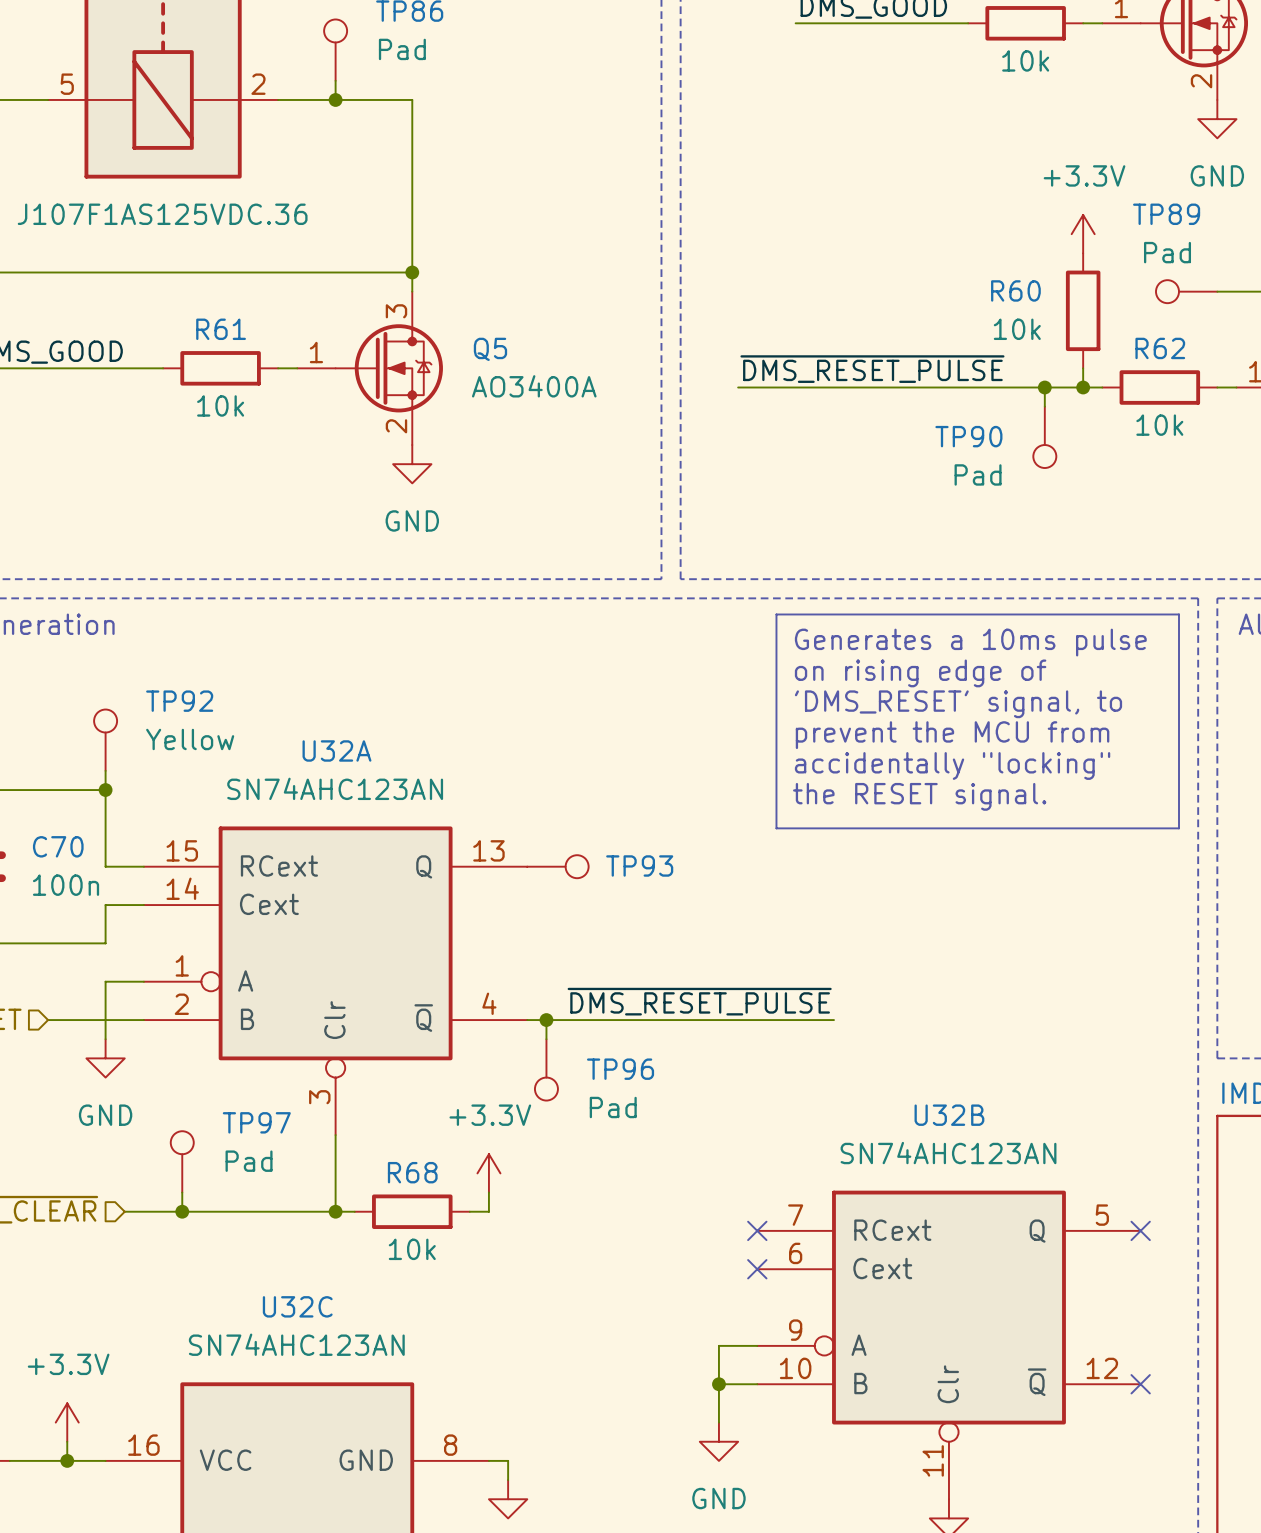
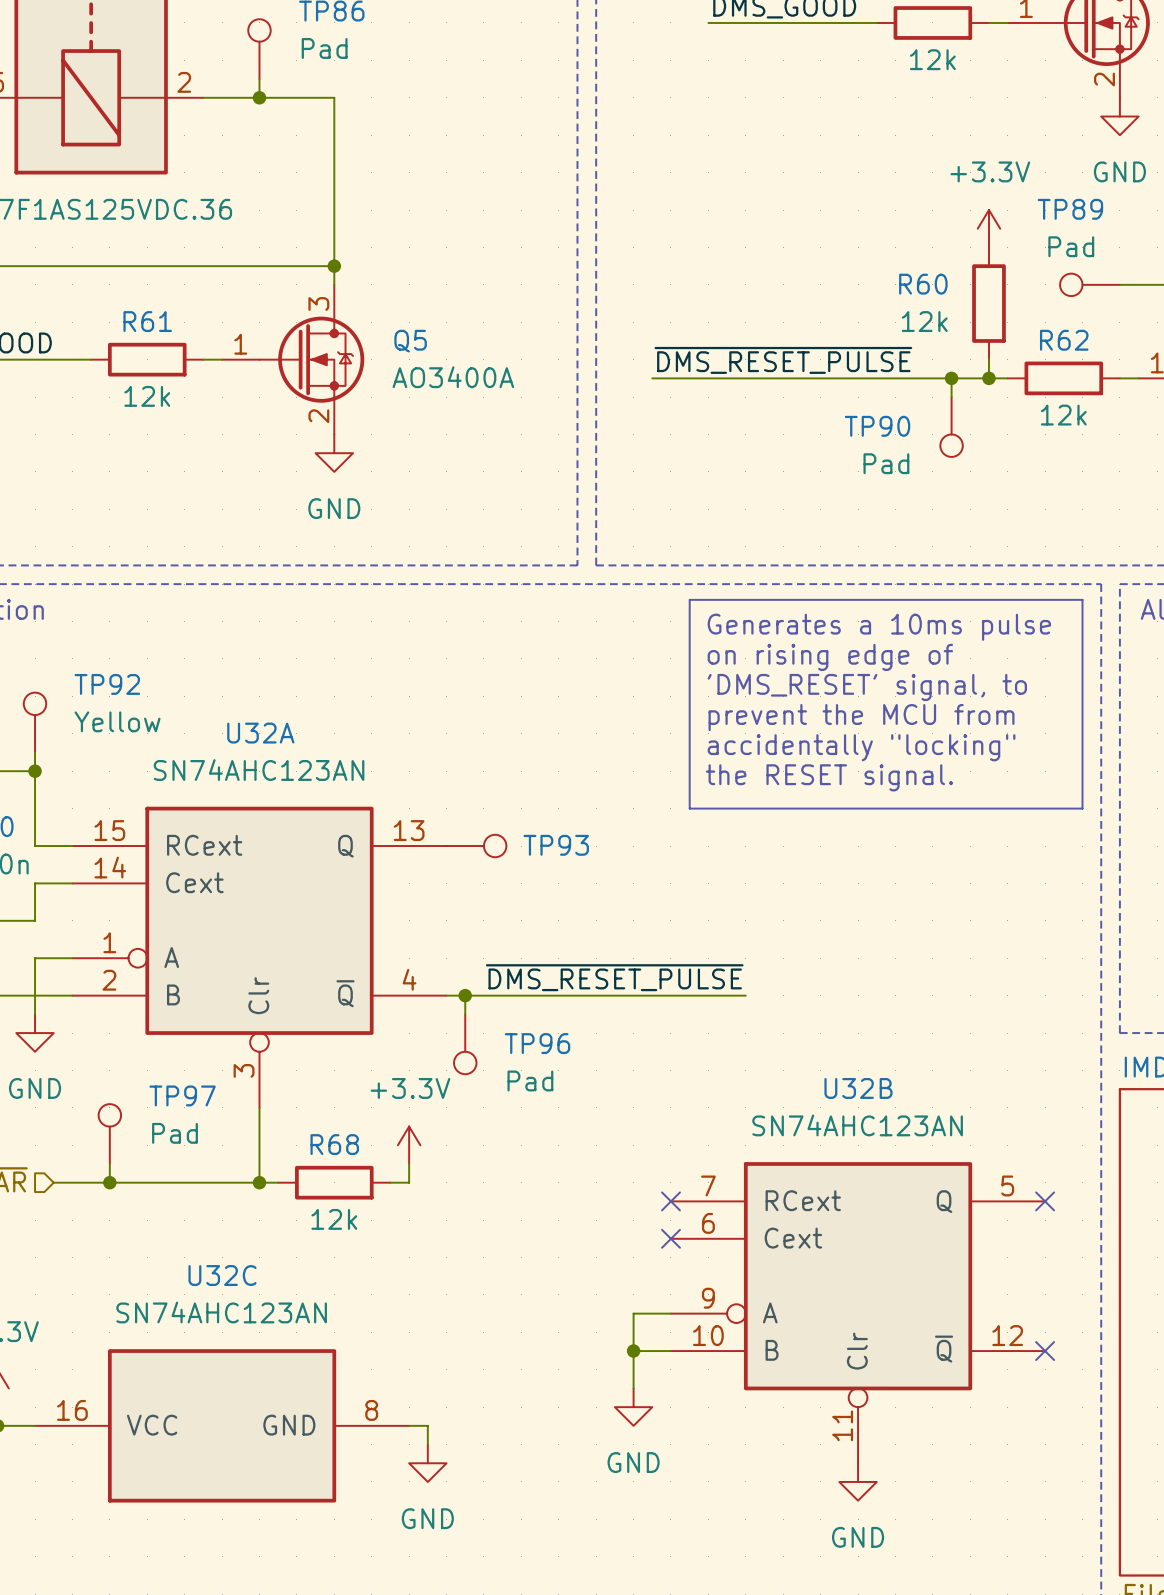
part value: 10k (1025, 60) -> 12k (932, 59)
R60 value: 10k (1017, 329) -> 12k (924, 321)
R61 value: 10k (220, 405) -> 12k (147, 396)
R62 value: 10k (1159, 425) -> 12k (1063, 415)
R68 value: 10k (412, 1249) -> 12k (334, 1219)

